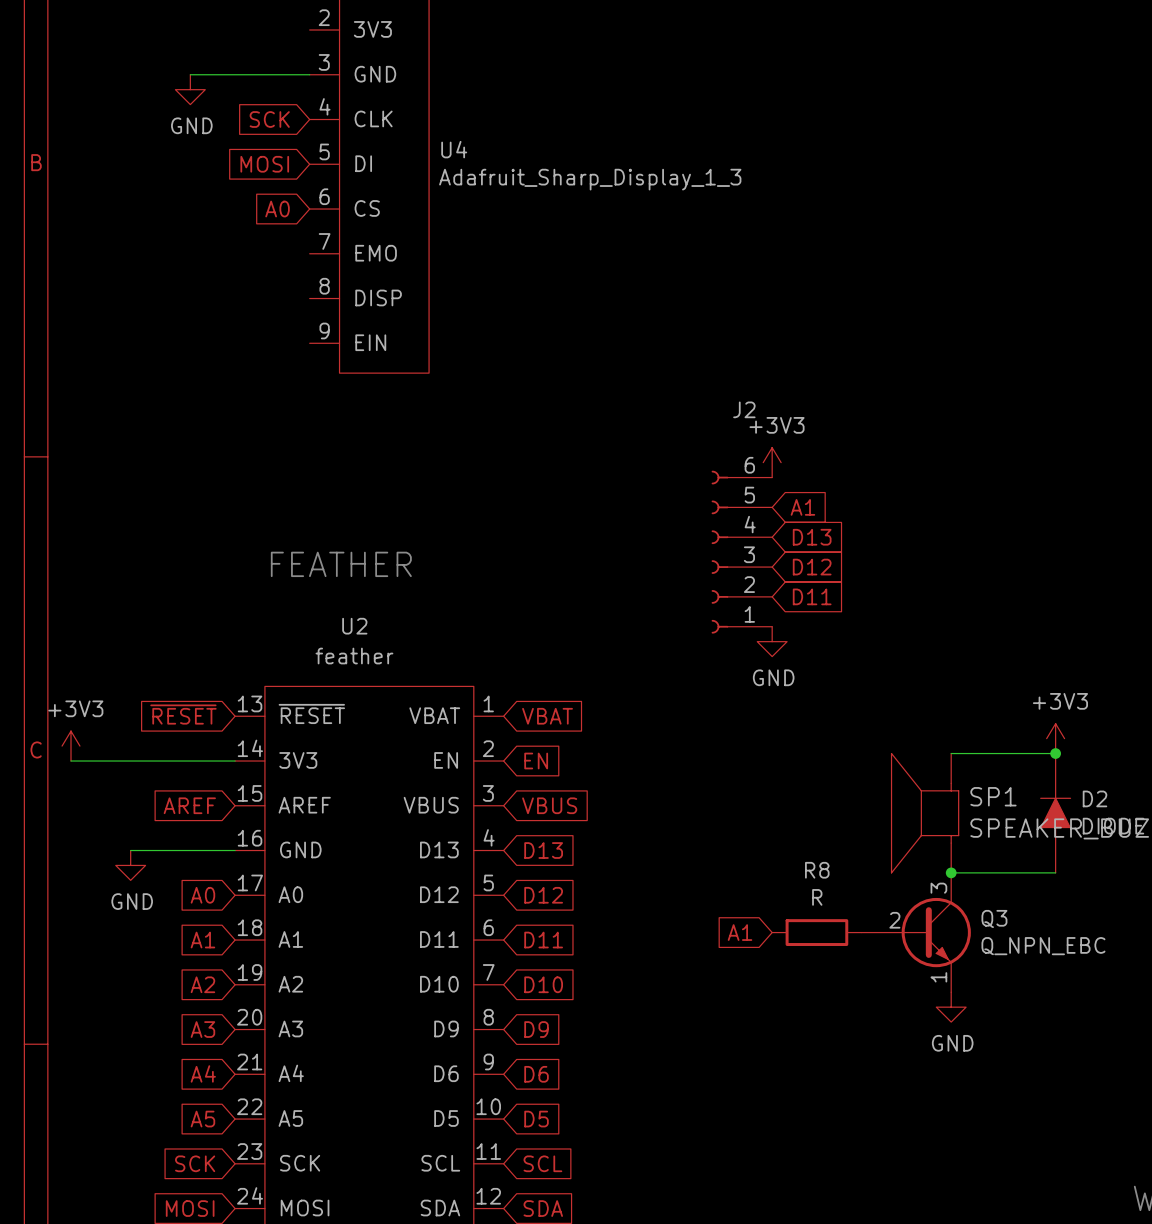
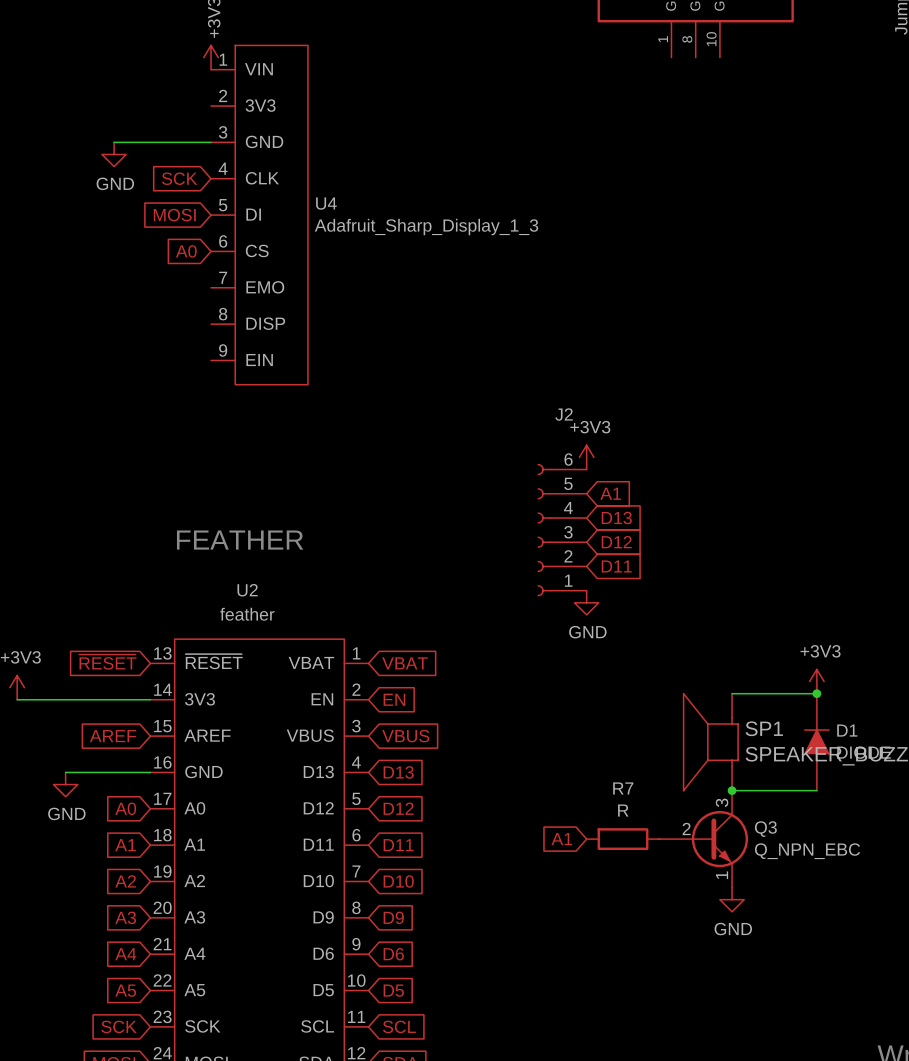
D2 name: D2 (1095, 798) -> D1 (847, 730)
R8 name: R8 (817, 870) -> R7 (623, 788)

